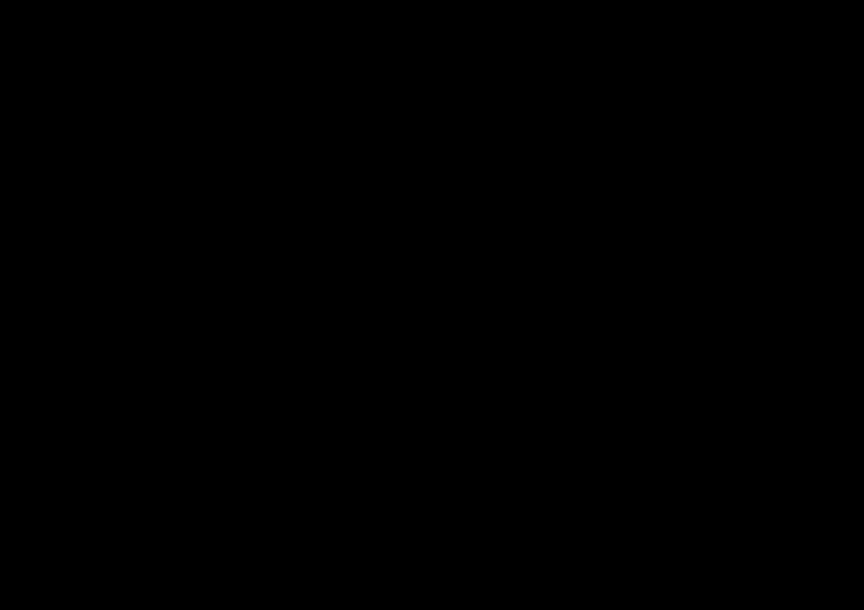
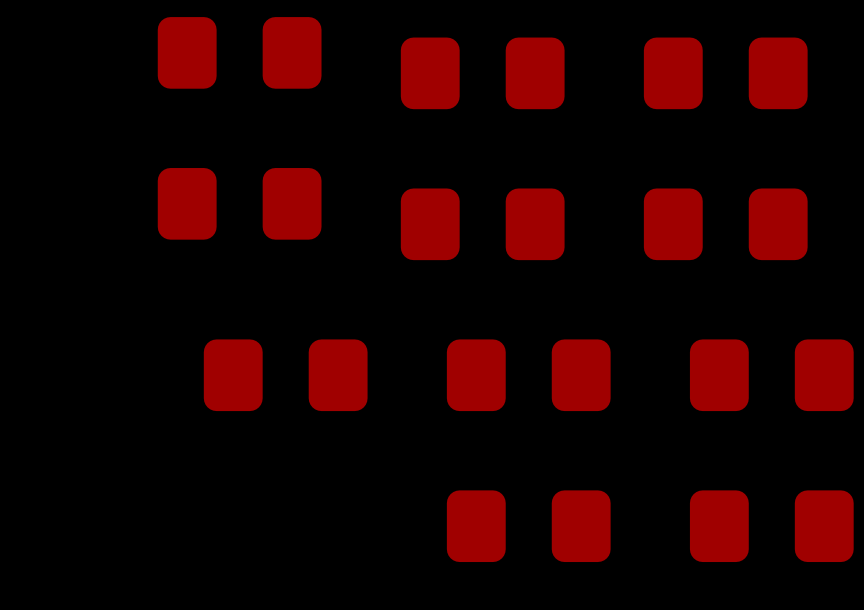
part: none -> (239, 52)
part: none -> (482, 73)
part: none -> (725, 73)
part: none -> (239, 203)
part: none -> (482, 224)
part: none -> (725, 224)
part: none -> (285, 375)
part: none -> (528, 375)
part: none -> (771, 375)
part: none -> (528, 526)
part: none -> (771, 526)

